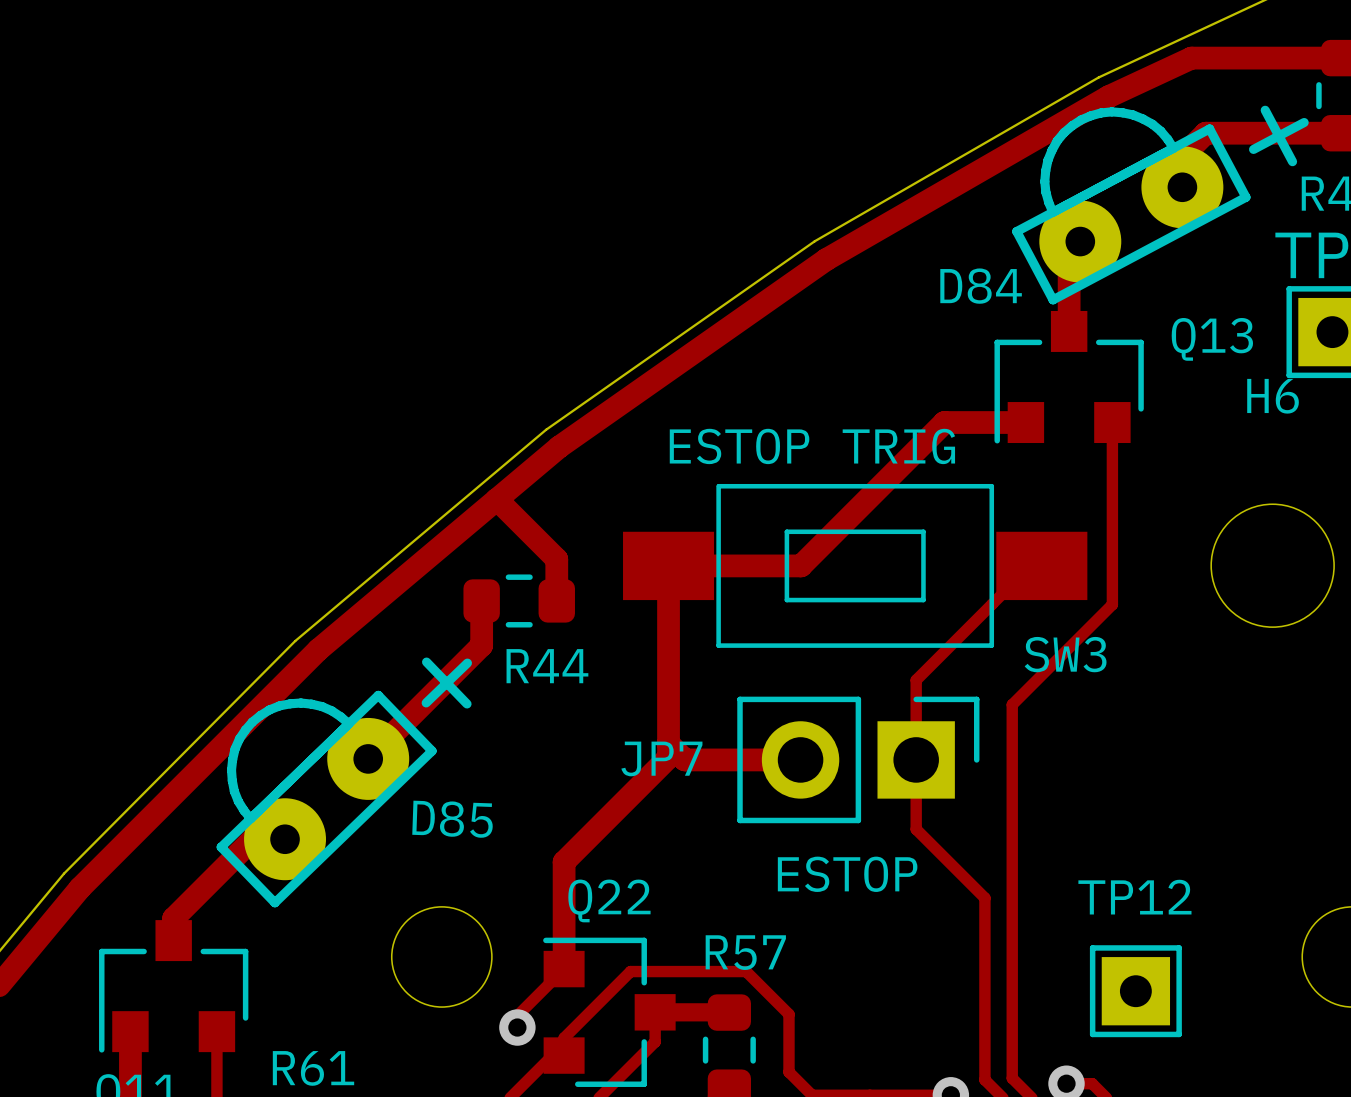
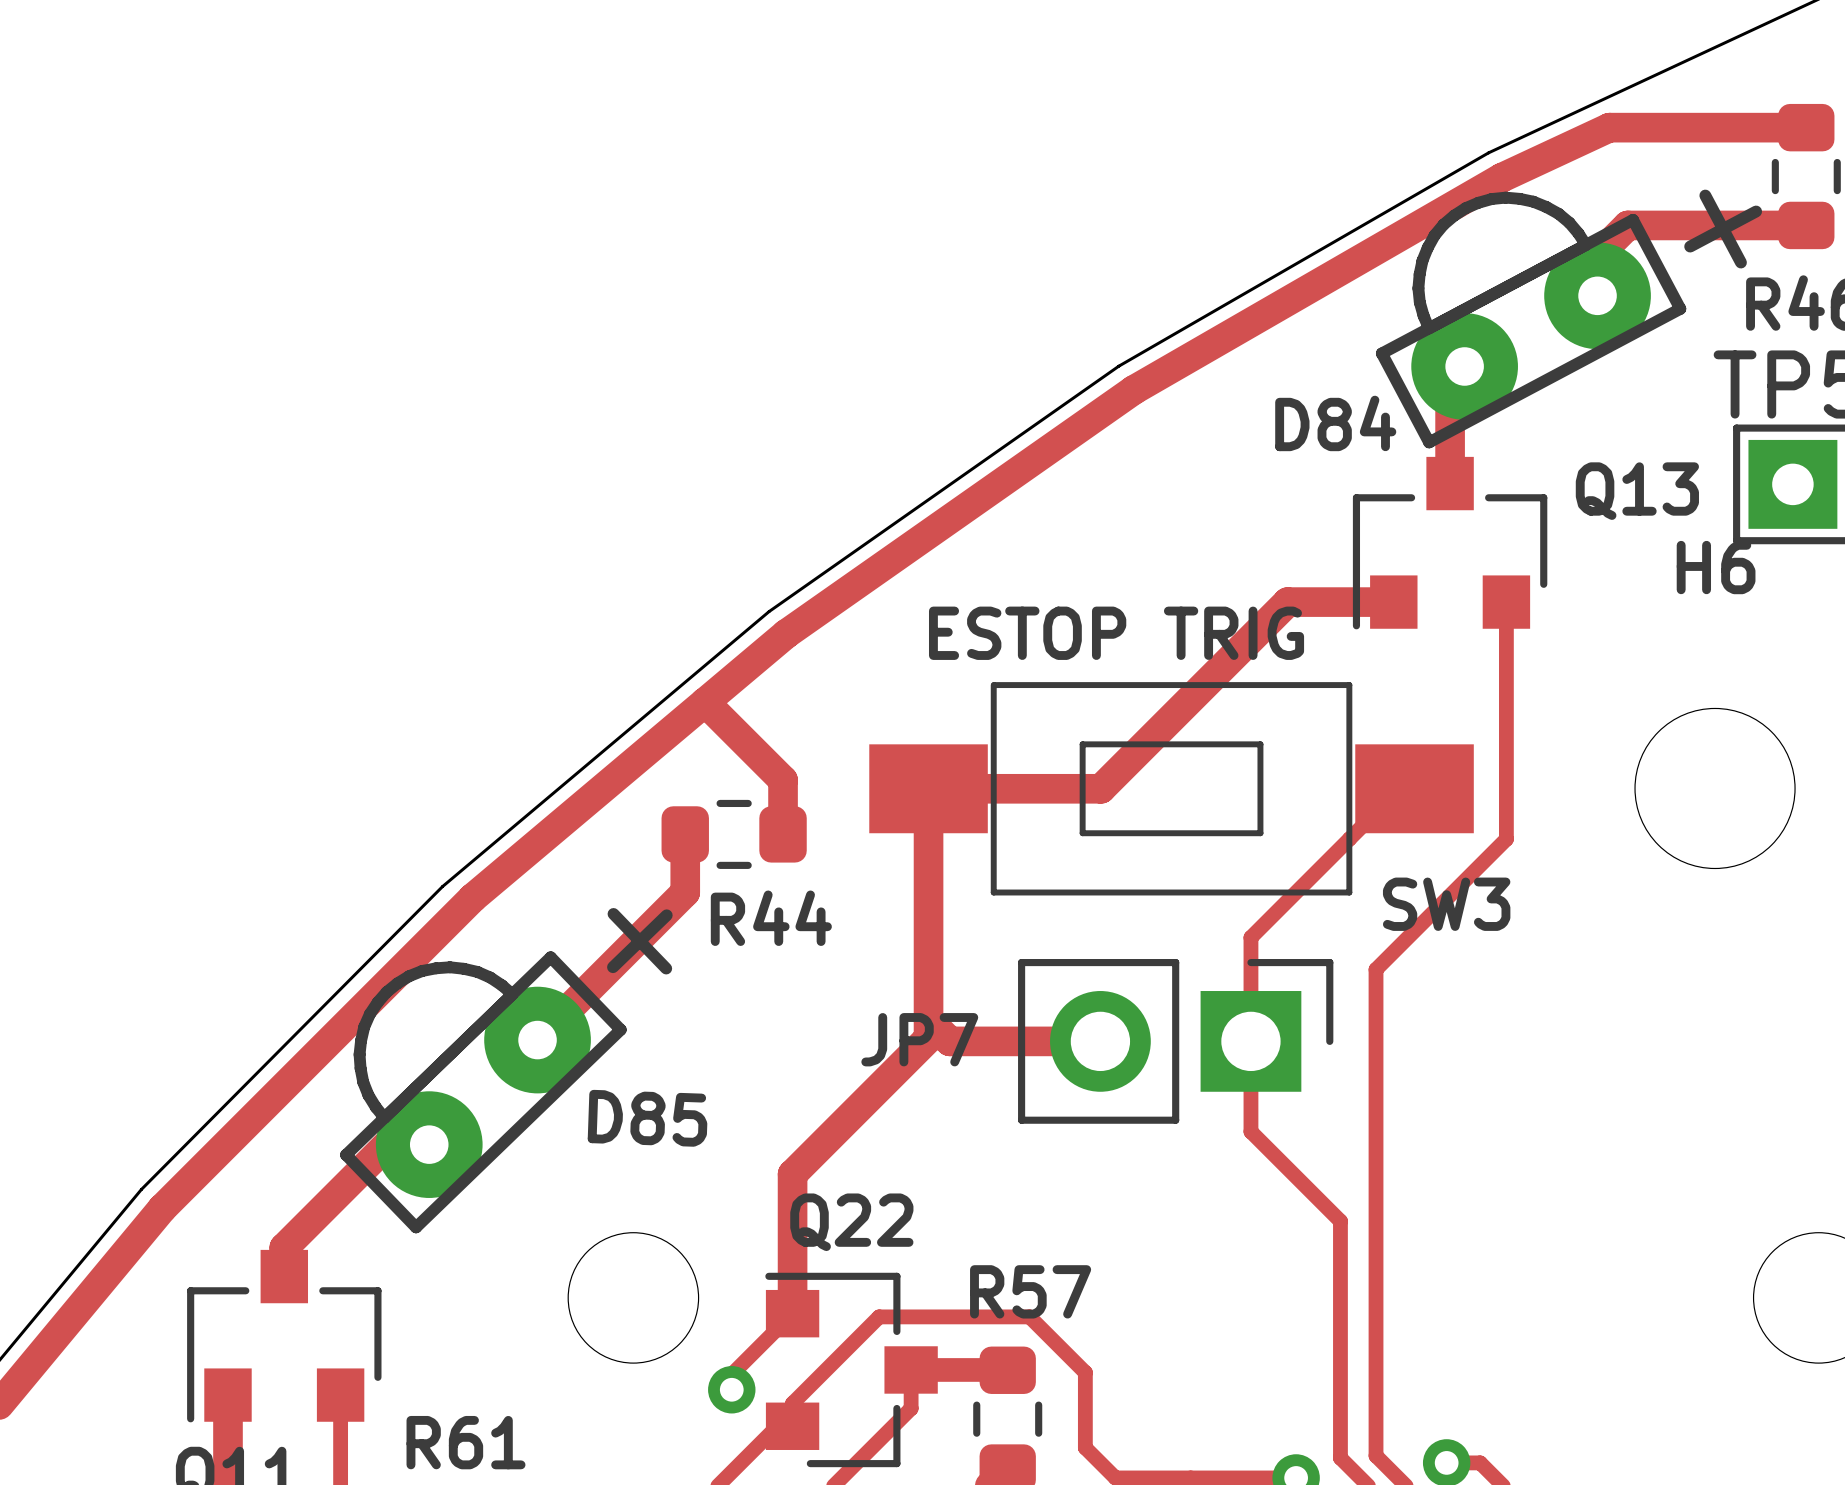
text: ESTOP (847, 874) -> none
TP12: (1135, 991) -> none

